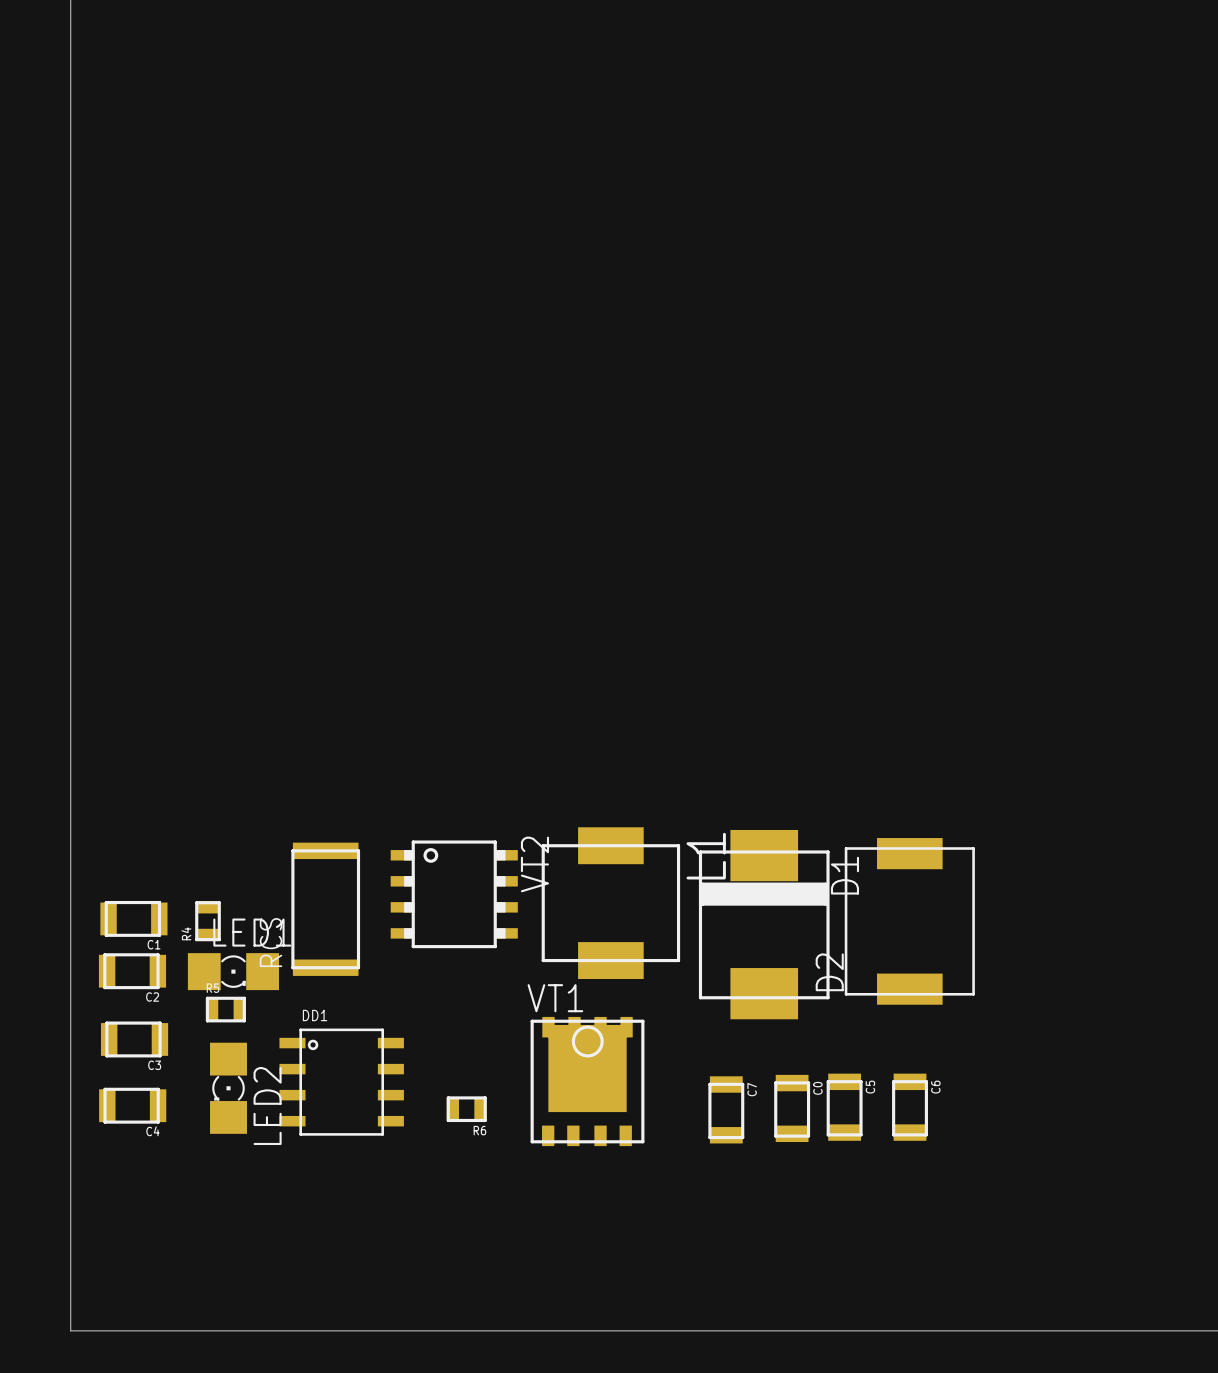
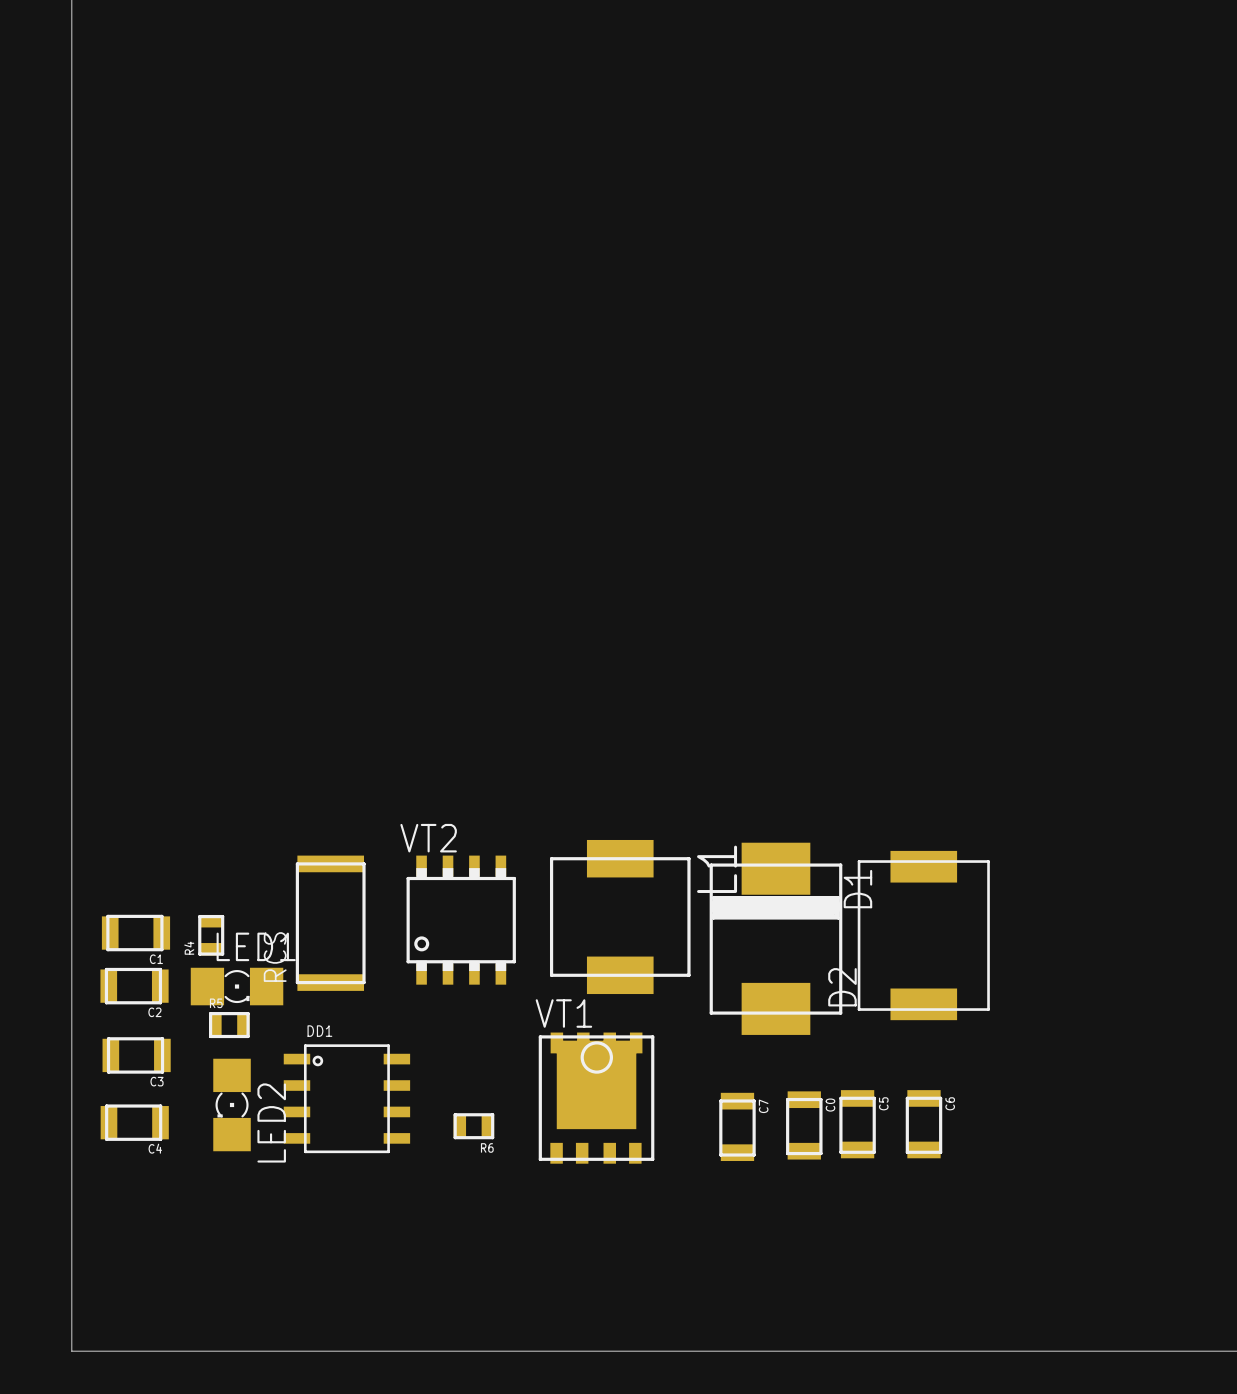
VT2 rotation: 0° (454, 894) -> 90° counterclockwise (461, 920)

